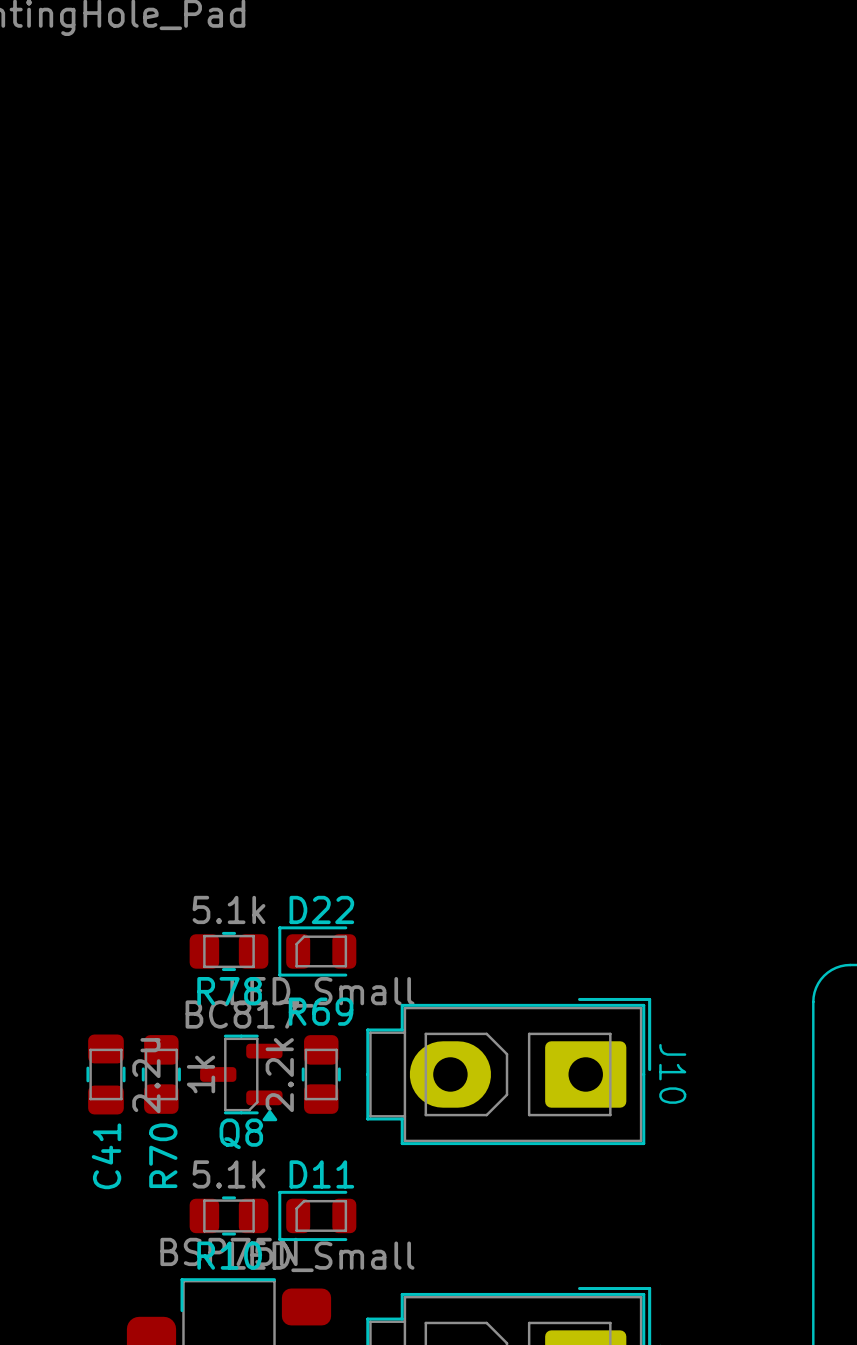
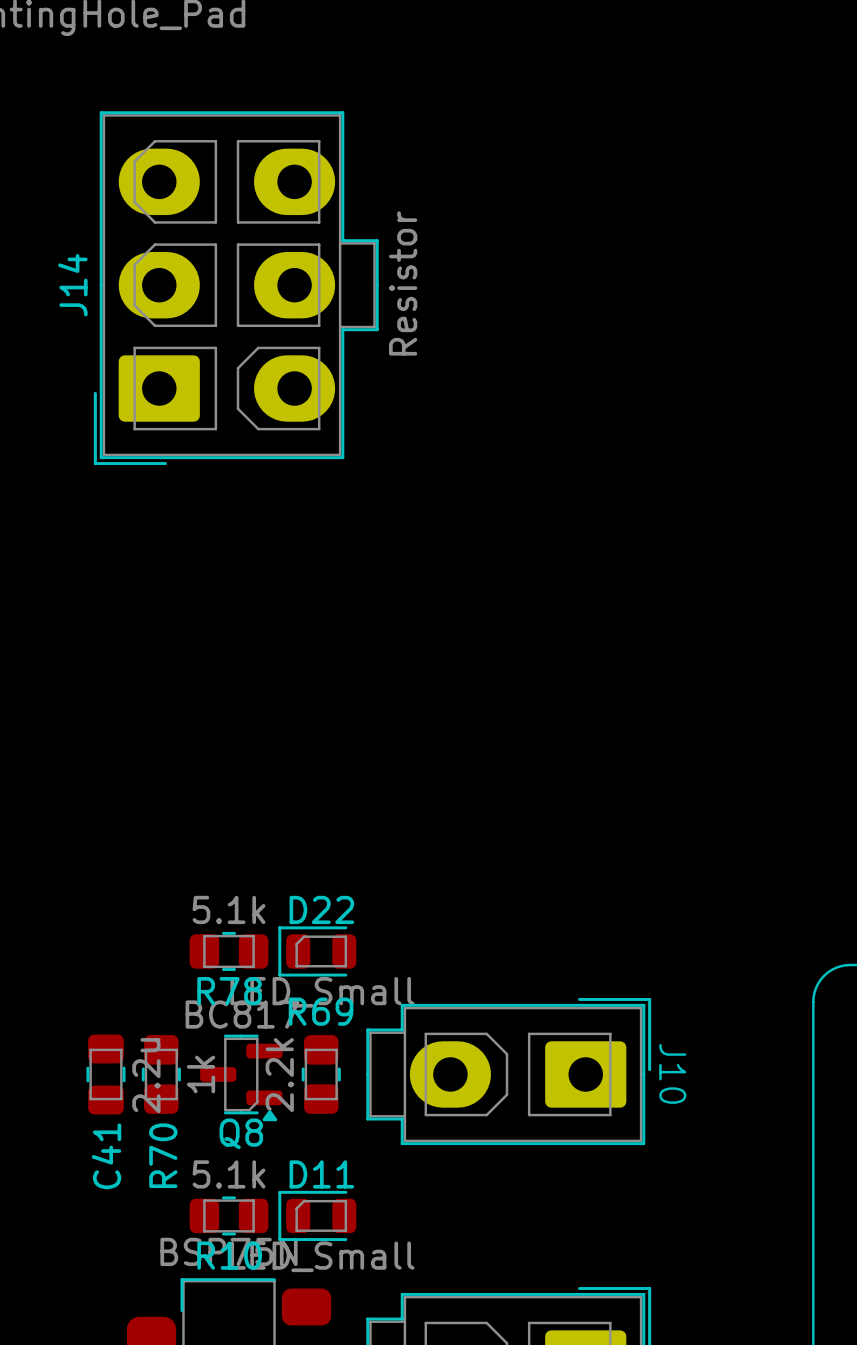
J14: none -> Resistor (236, 288)

